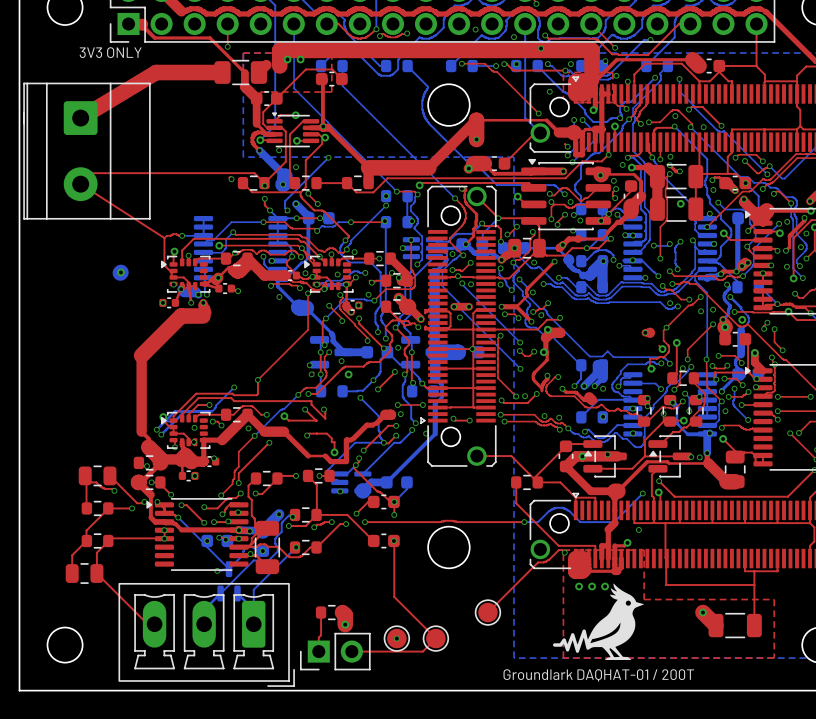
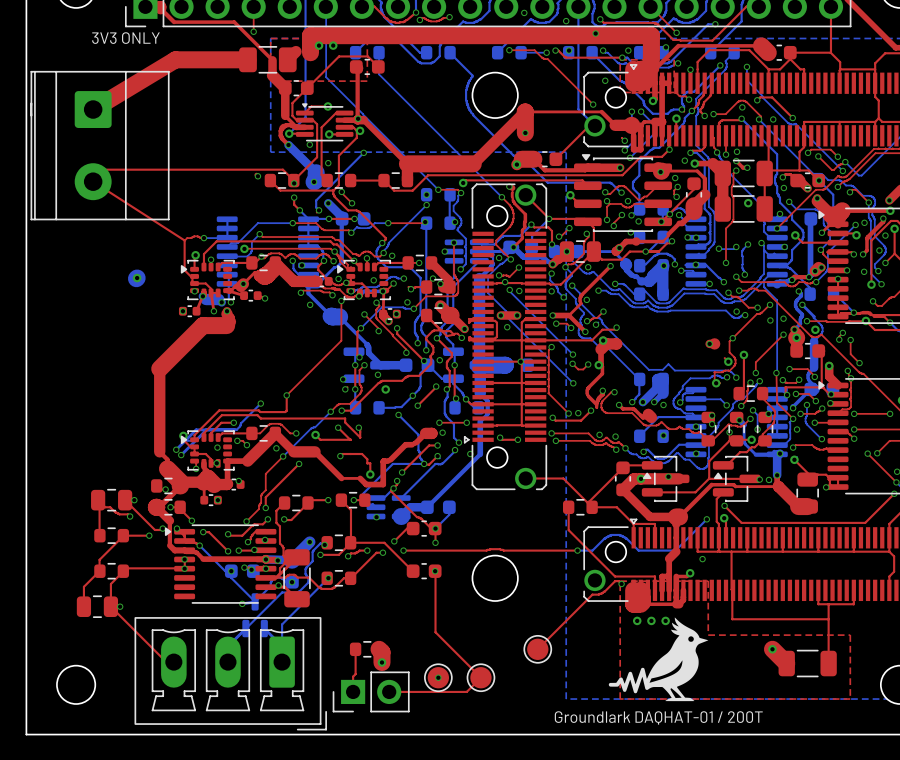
via: none -> (826, 487)
via: none -> (134, 500)
via: none -> (120, 606)

